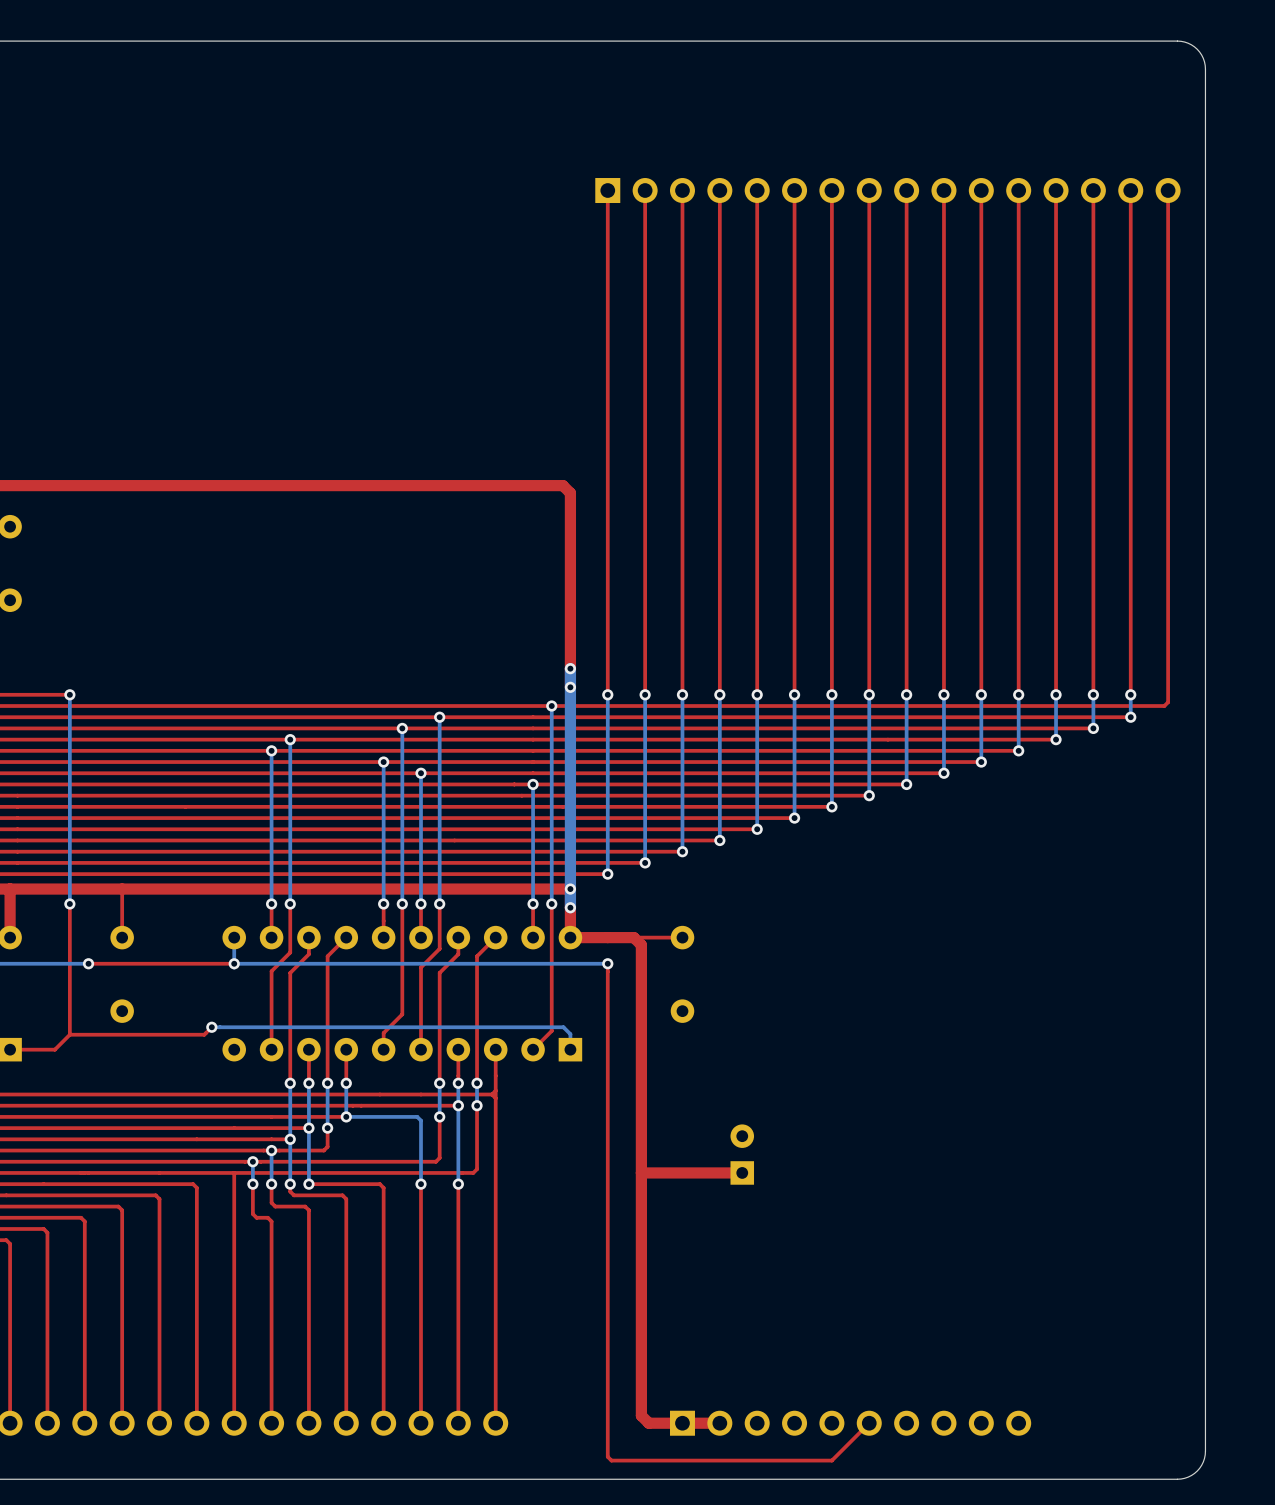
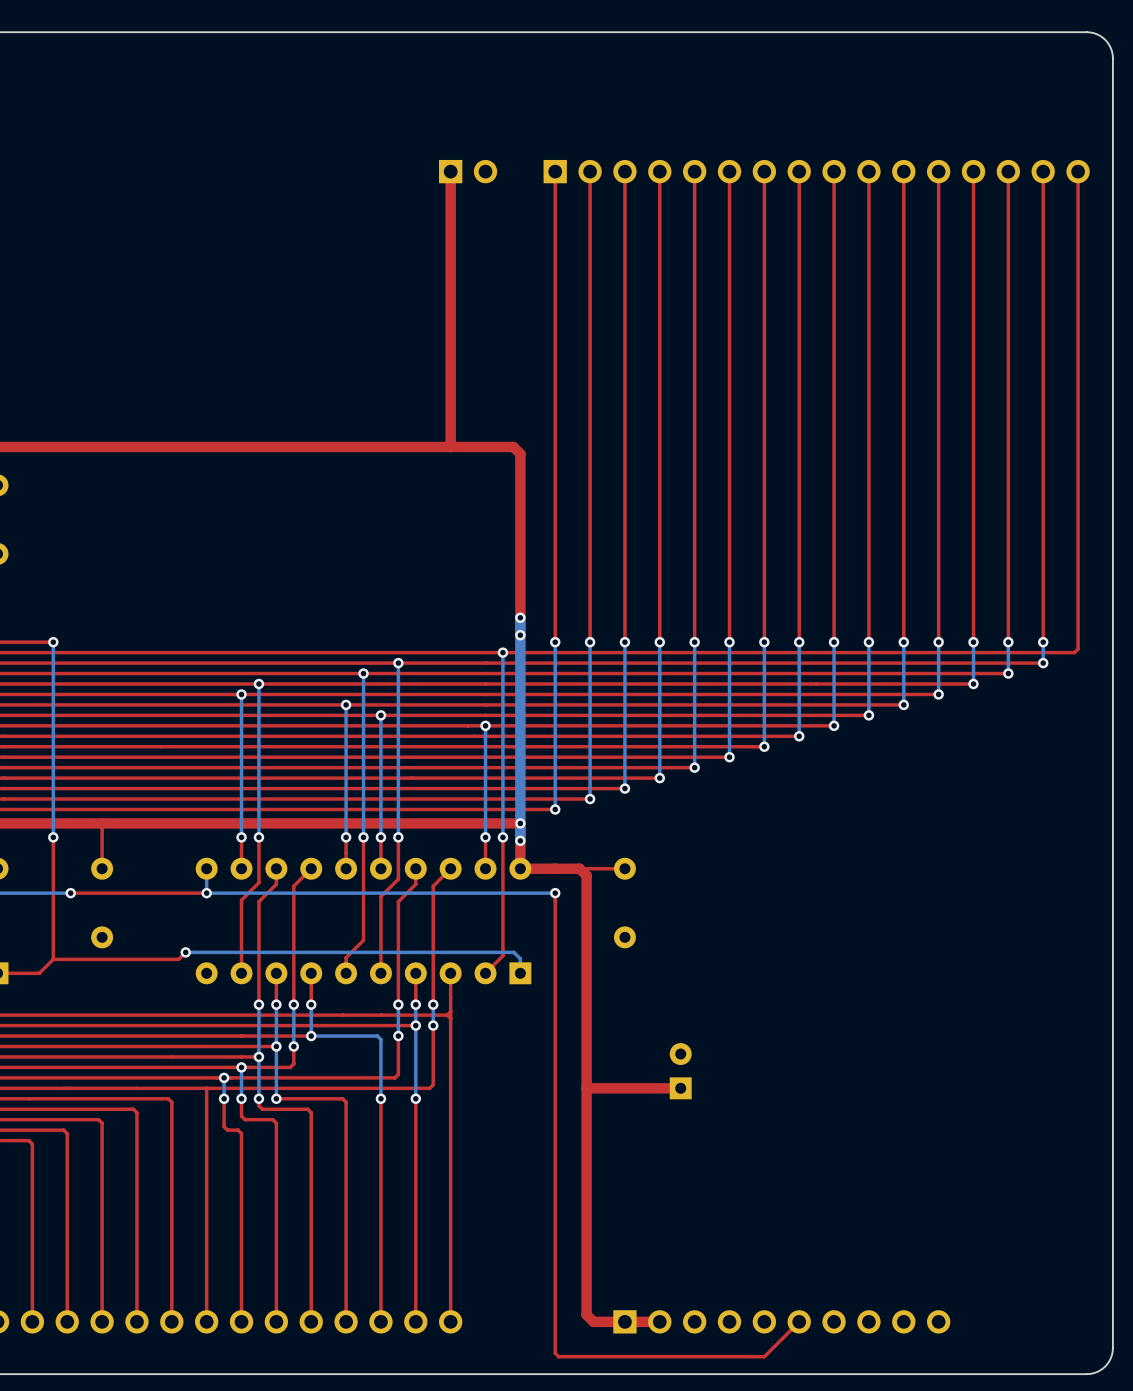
top track: none -> (450, 171) (450, 446)
part: none -> (468, 171)

